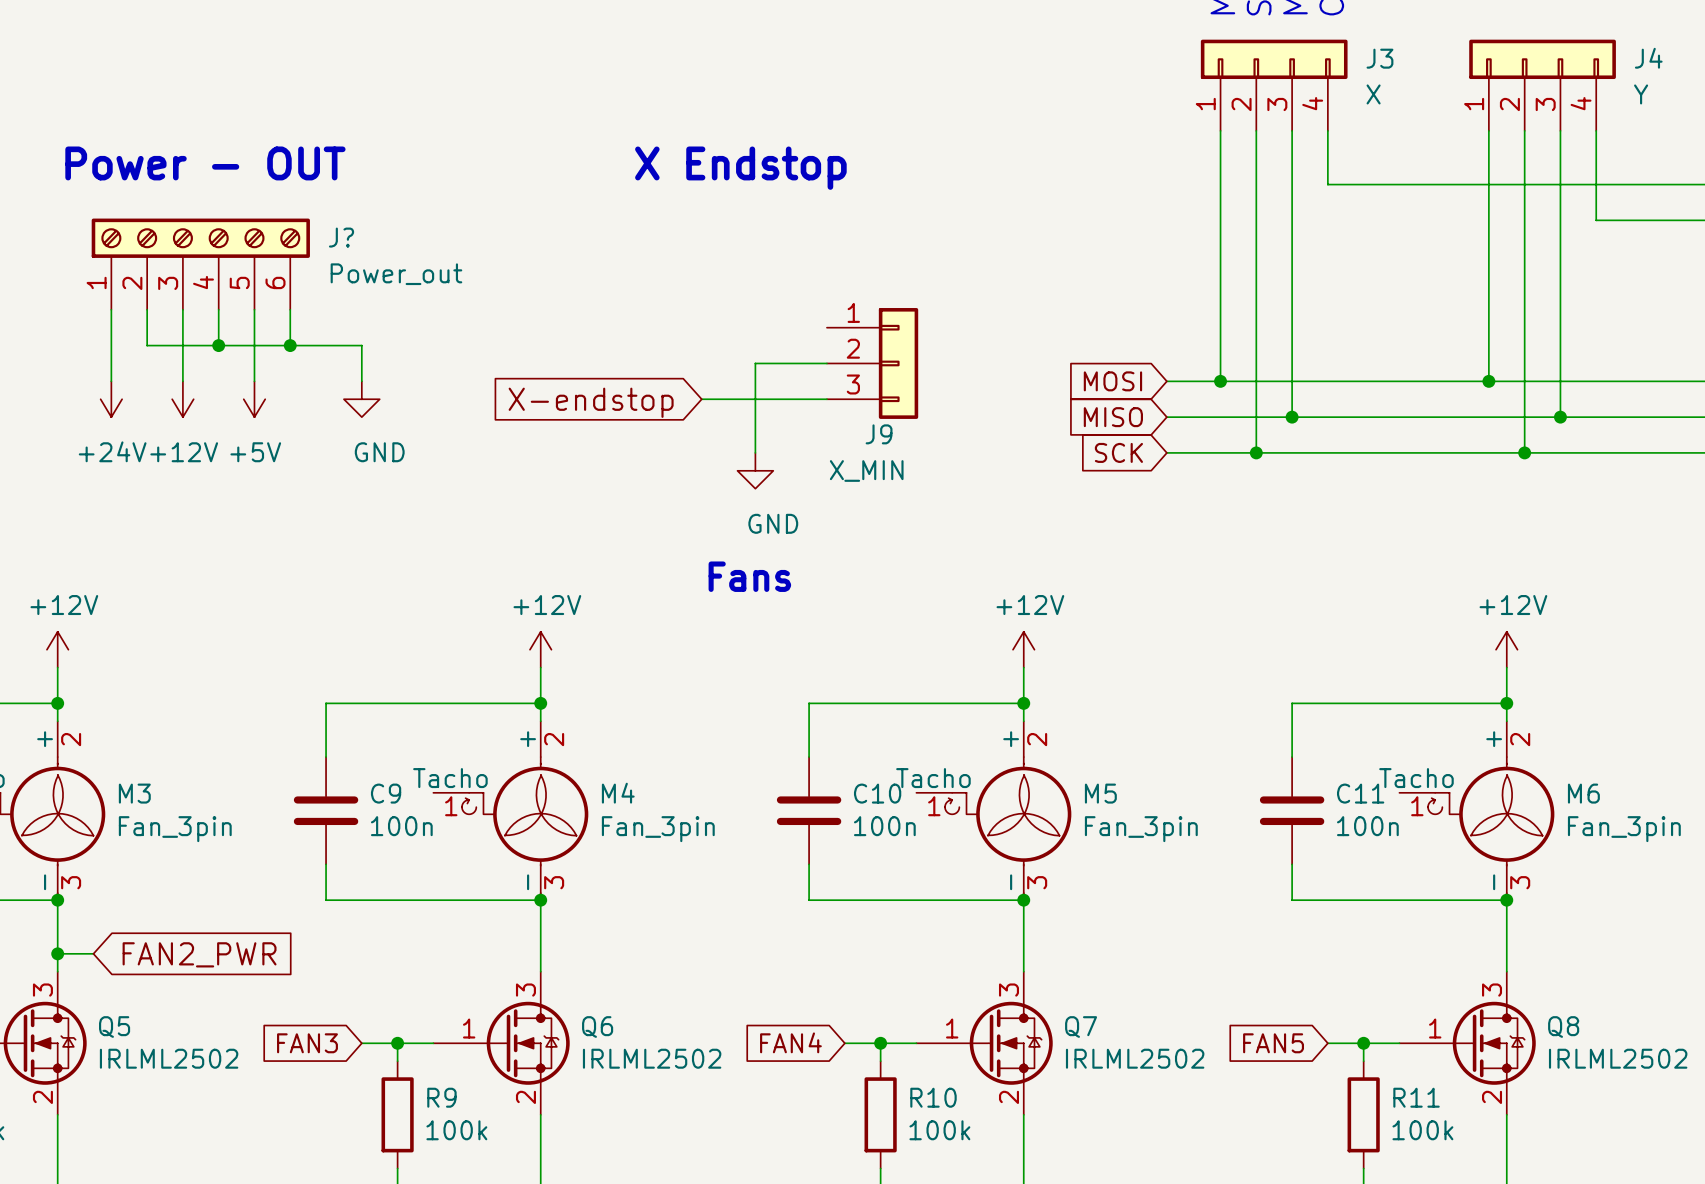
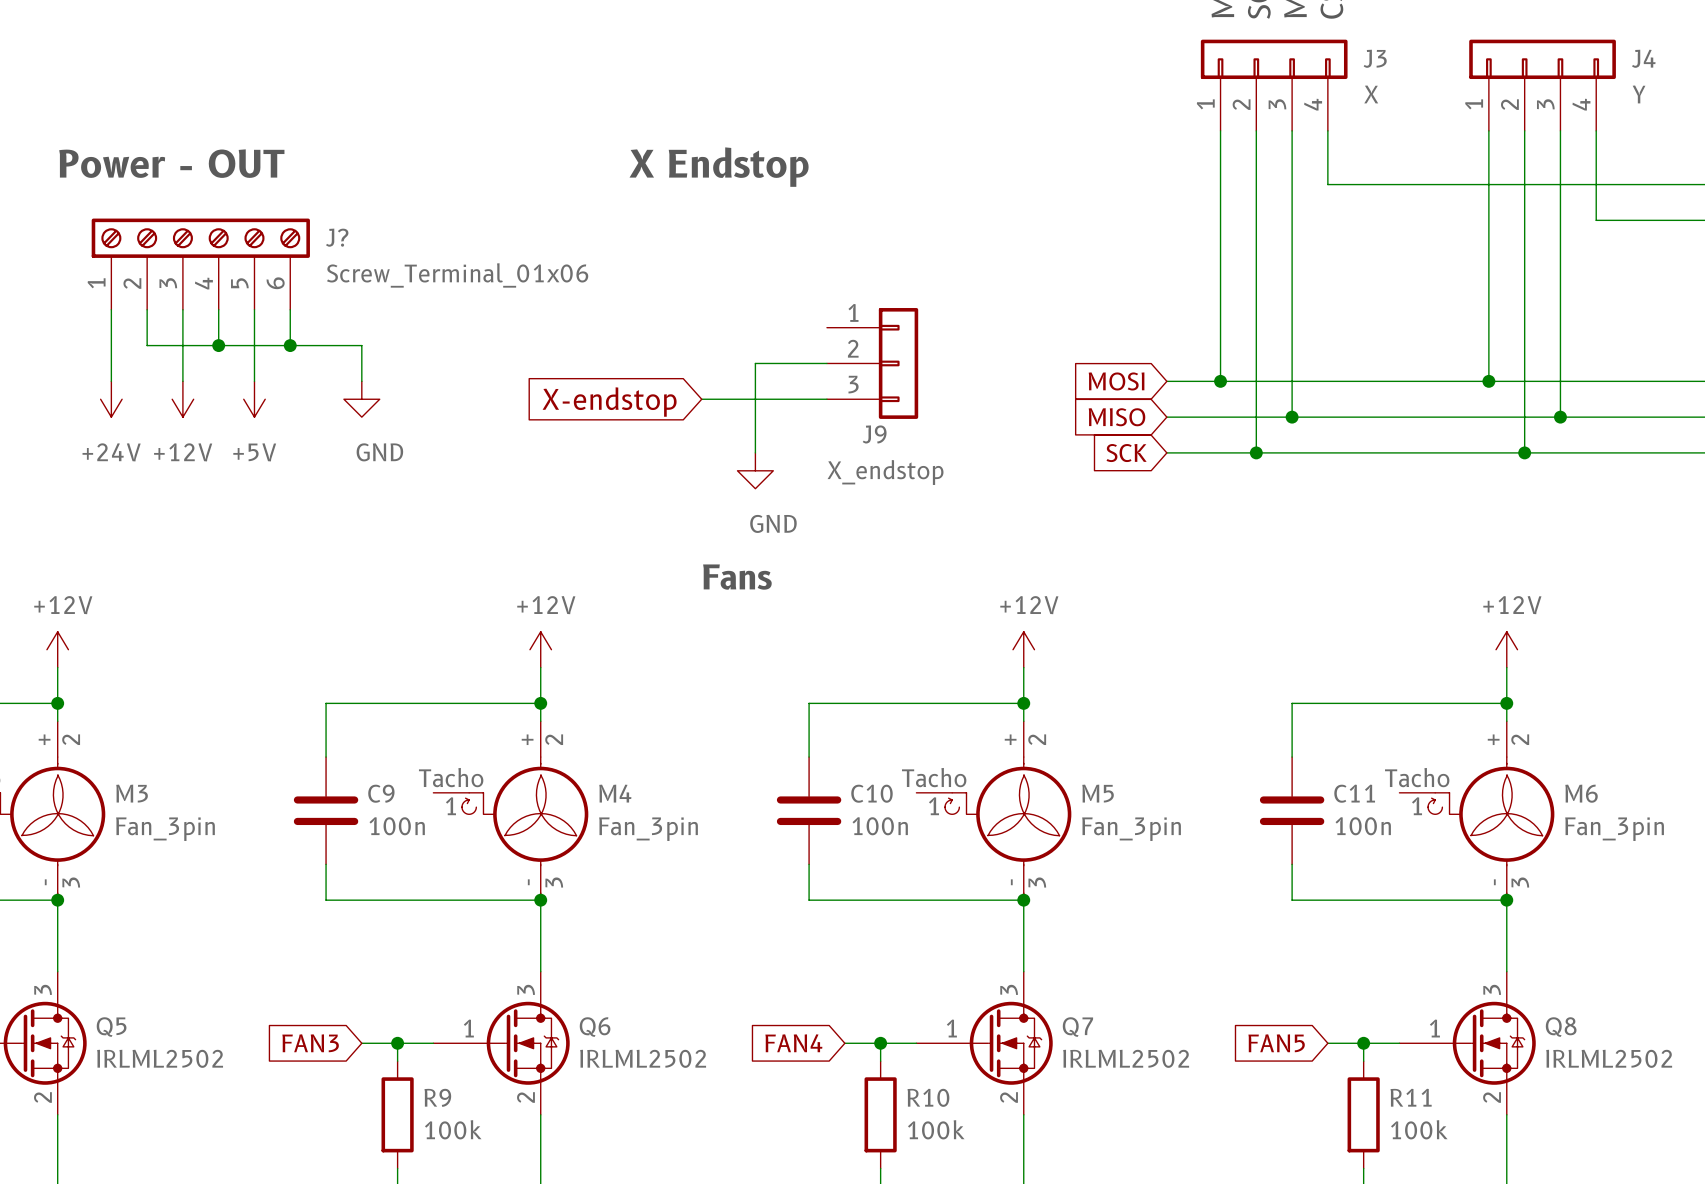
J? value: Power_out (396, 274) -> Screw_Terminal_01x06 (457, 275)
J9 value: X_MIN (866, 470) -> X_endstop (885, 472)
wire: (57, 953) (93, 953) -> none
junction: (57, 953) -> none
global label: FAN2_PWR (199, 954) -> none

